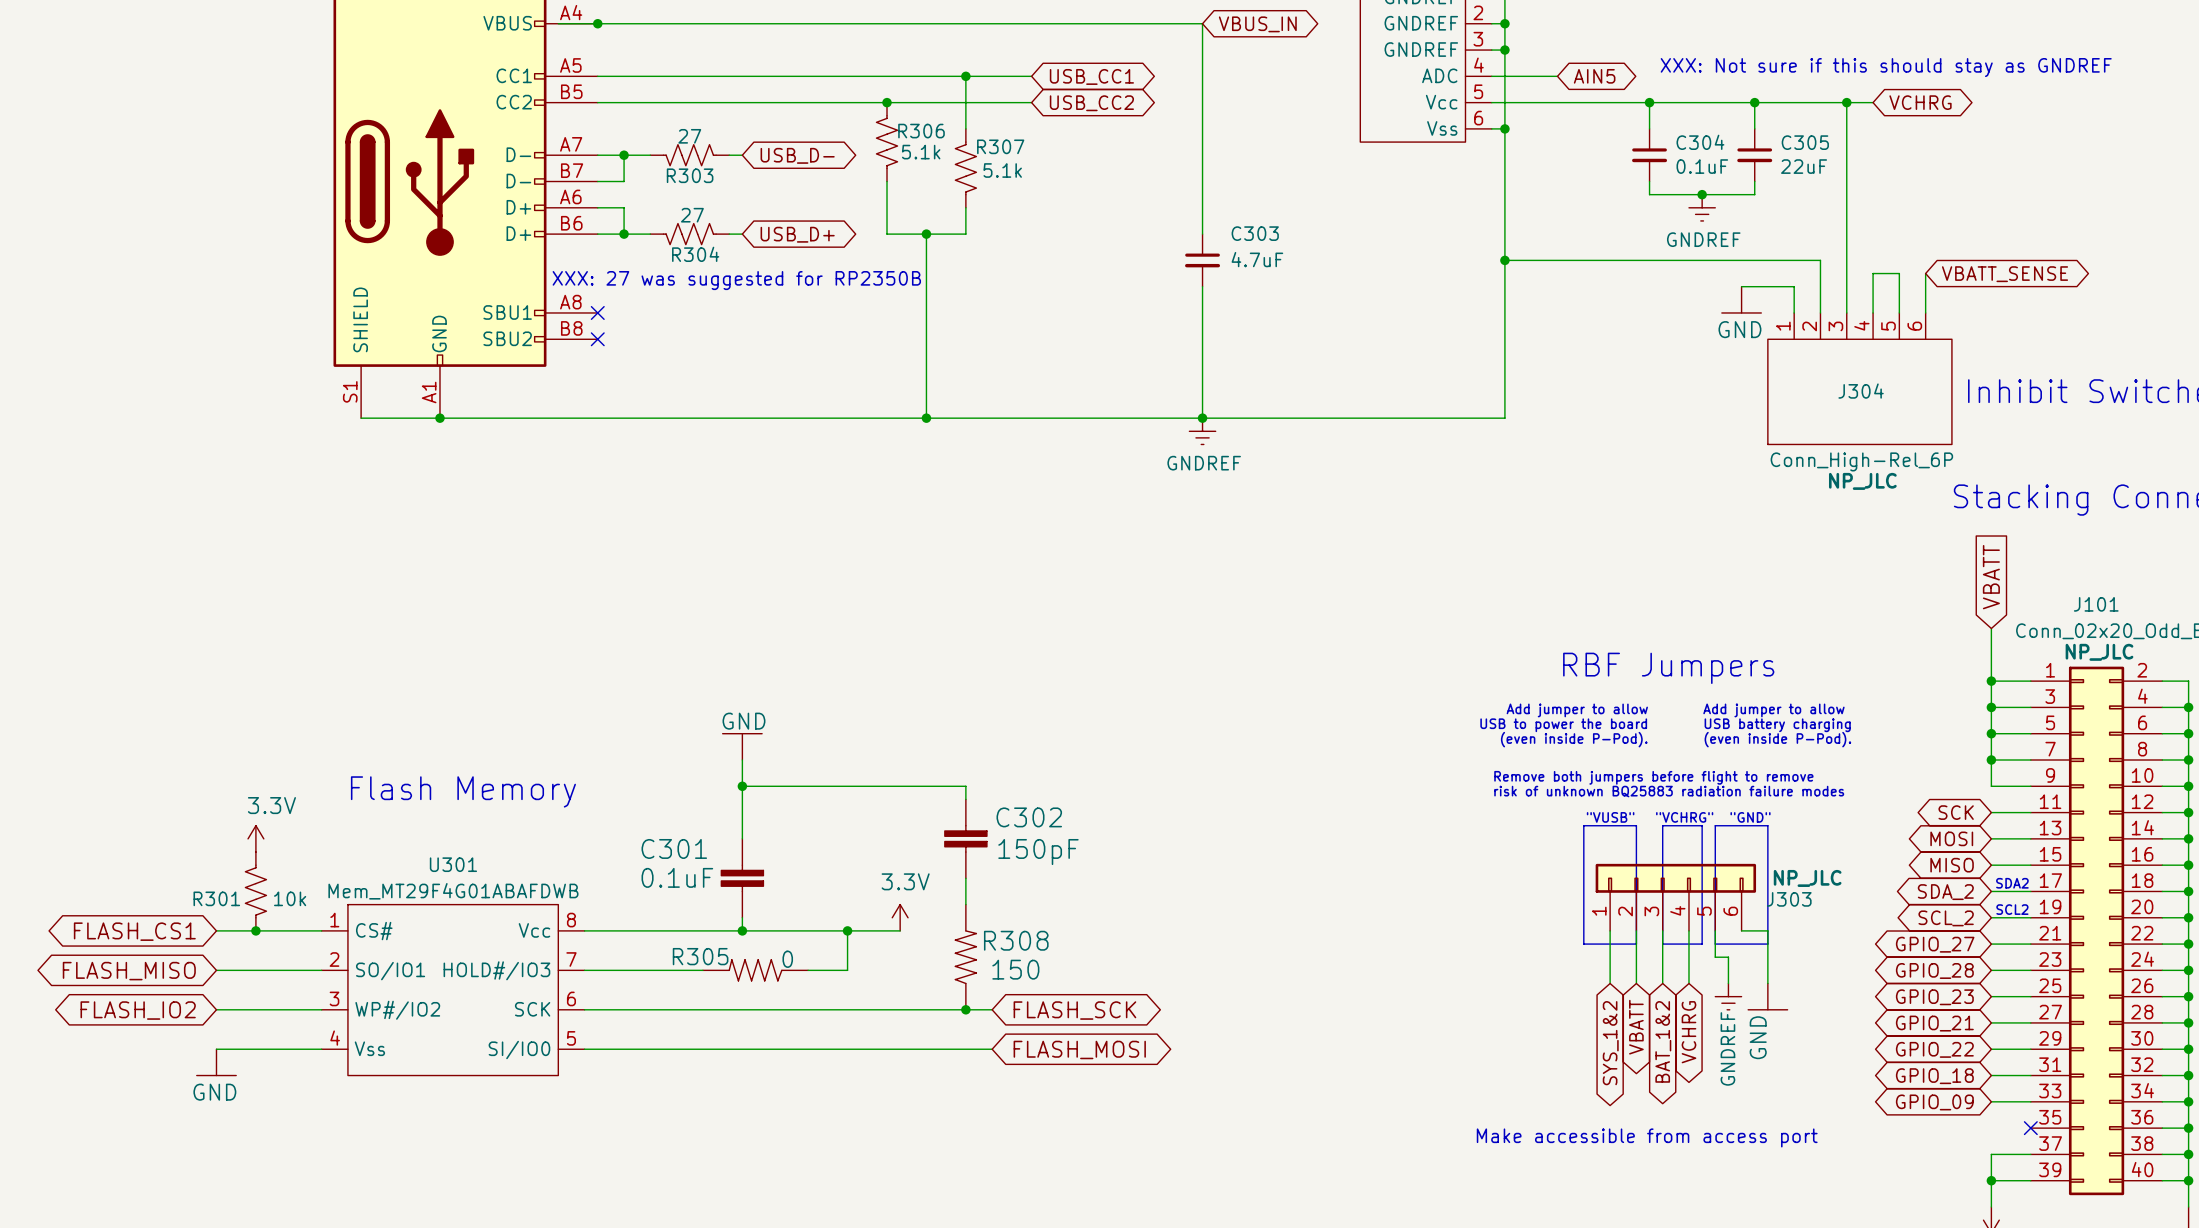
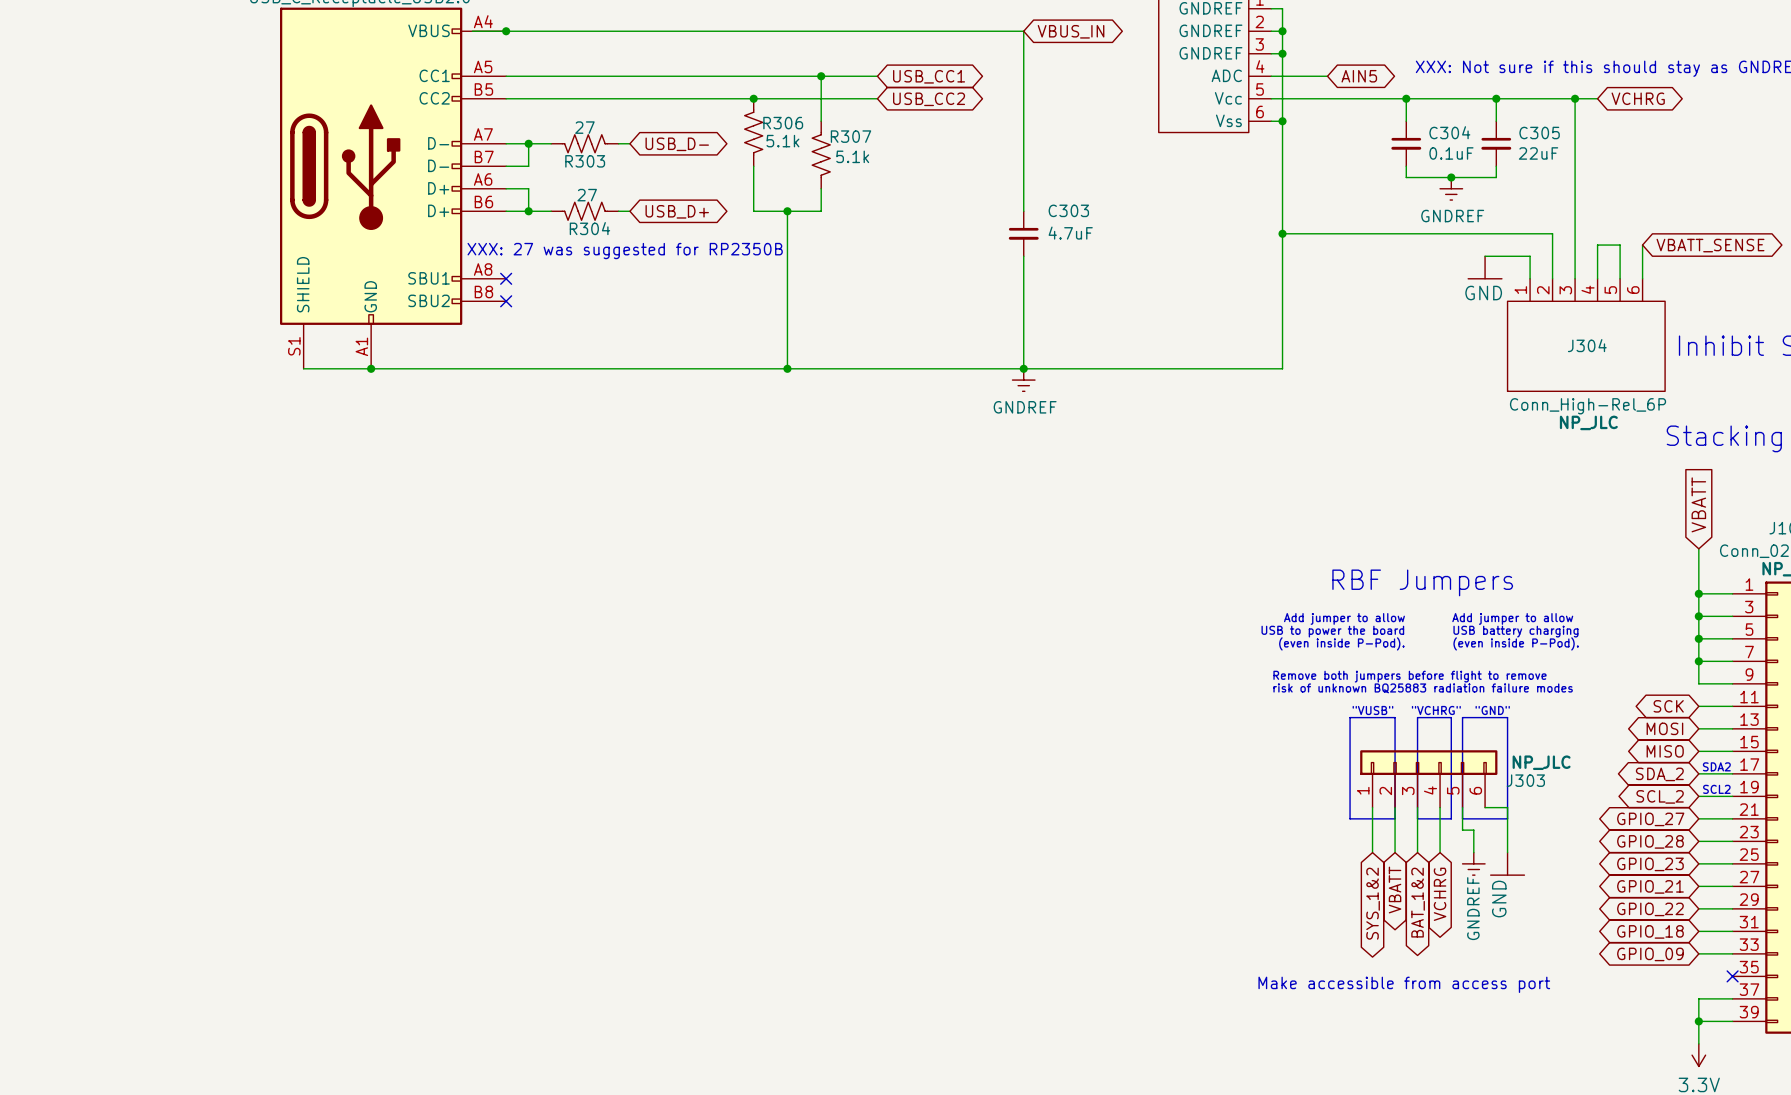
power symbol: GND (742, 746) -> none
wire: (742, 759) (742, 838) -> none
wire: (742, 786) (965, 786) (965, 799) -> none
junction: (742, 786) -> none
text: Flash Memory (463, 791) -> none
power symbol: 3.3V (255, 838) -> none
C302: 150pF (965, 838) -> none
C301: 0.1uF (742, 878) -> none
wire: (965, 878) (965, 904) -> none
R301: 10k (255, 891) -> none
wire: (742, 917) (742, 930) -> none
power symbol: 3.3V (900, 917) -> none
wire: (216, 930) (321, 930) -> none
junction: (255, 930) -> none
wire: (584, 930) (900, 930) -> none
junction: (742, 930) -> none
wire: (847, 930) (847, 970) (808, 970) -> none
junction: (847, 930) -> none
global label: FLASH_CS1 (134, 931) -> none
R308: 150 (965, 957) -> none
wire: (216, 970) (321, 970) -> none
wire: (584, 970) (702, 970) -> none
R305: 0 (755, 970) -> none
global label: FLASH_MISO (129, 971) -> none
U301: Mem_MT29F4G01ABAFDWB (453, 990) -> none
wire: (216, 1009) (321, 1009) -> none
wire: (584, 1009) (992, 1009) -> none
junction: (965, 1009) -> none
global label: FLASH_IO2 (138, 1010) -> none
global label: FLASH_SCK (1074, 1010) -> none
wire: (216, 1049) (321, 1049) -> none
wire: (584, 1049) (992, 1049) -> none
global label: FLASH_MOSI (1079, 1049) -> none
power symbol: GND (216, 1062) -> none

